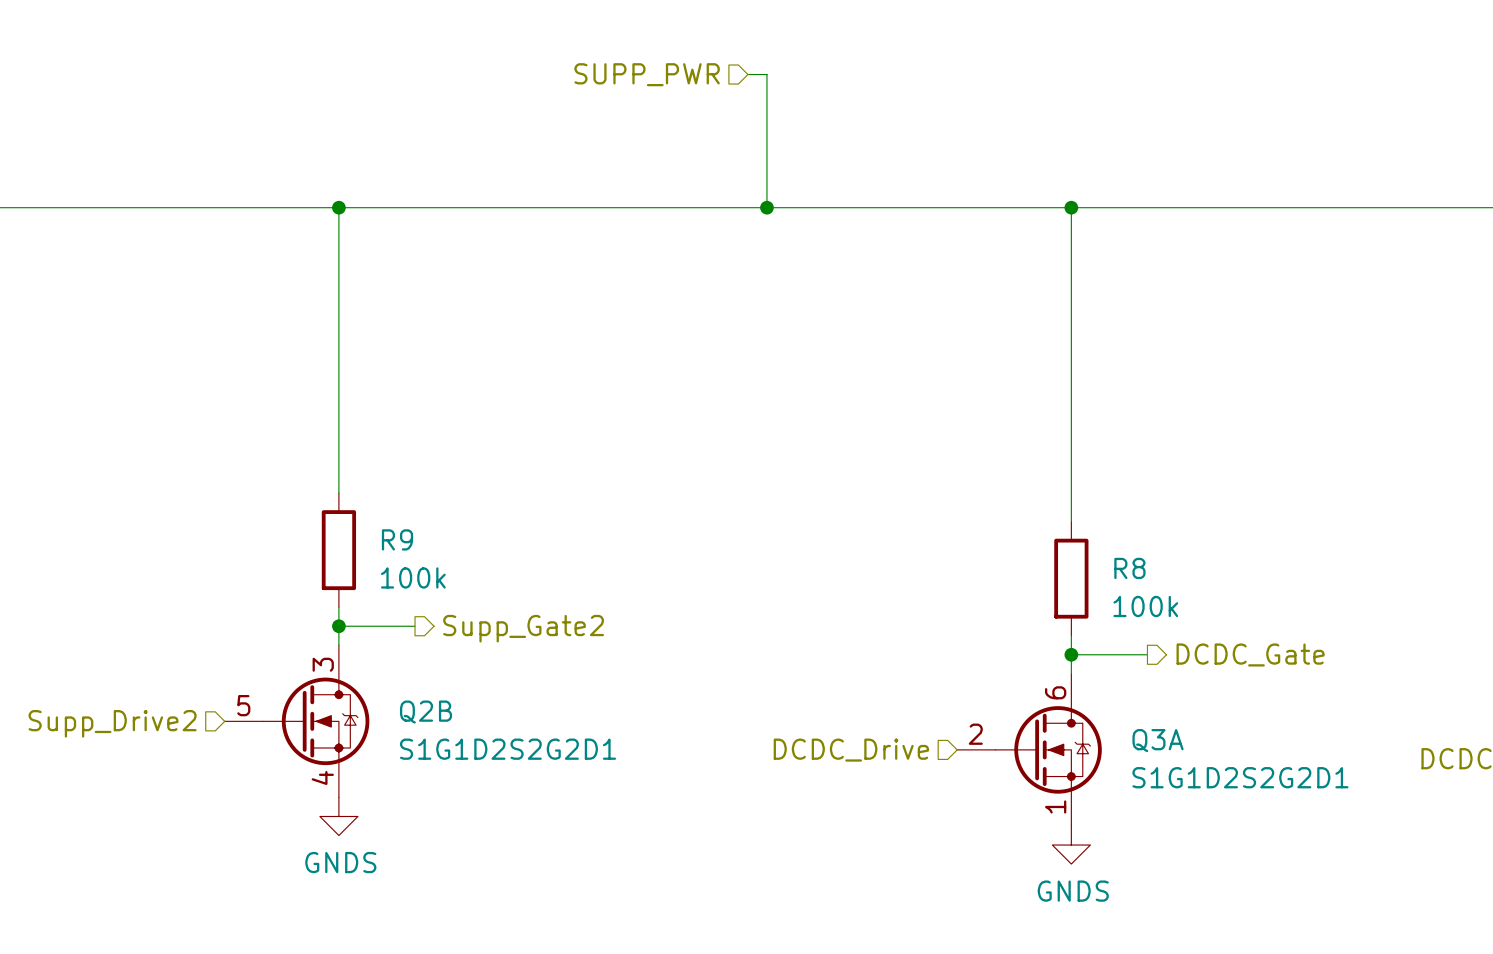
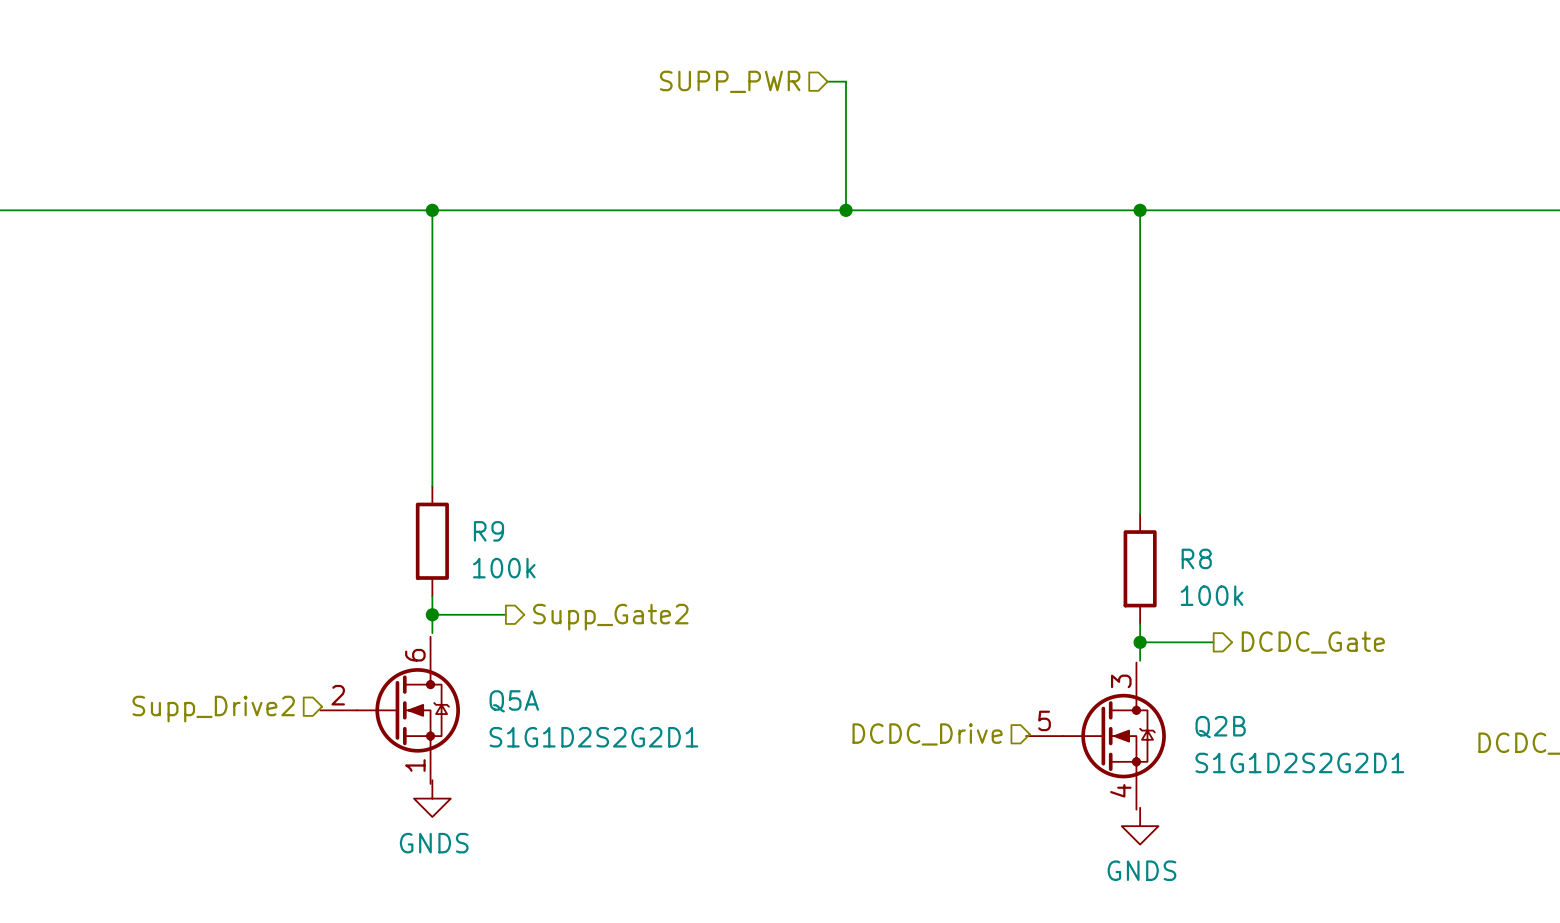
Q2B position: (297, 721) -> (1096, 736)
Q5A: none -> S1G1D2S2G2D1 (390, 710)
Q3A: S1G1D2S2G2D1 (1029, 749) -> none

